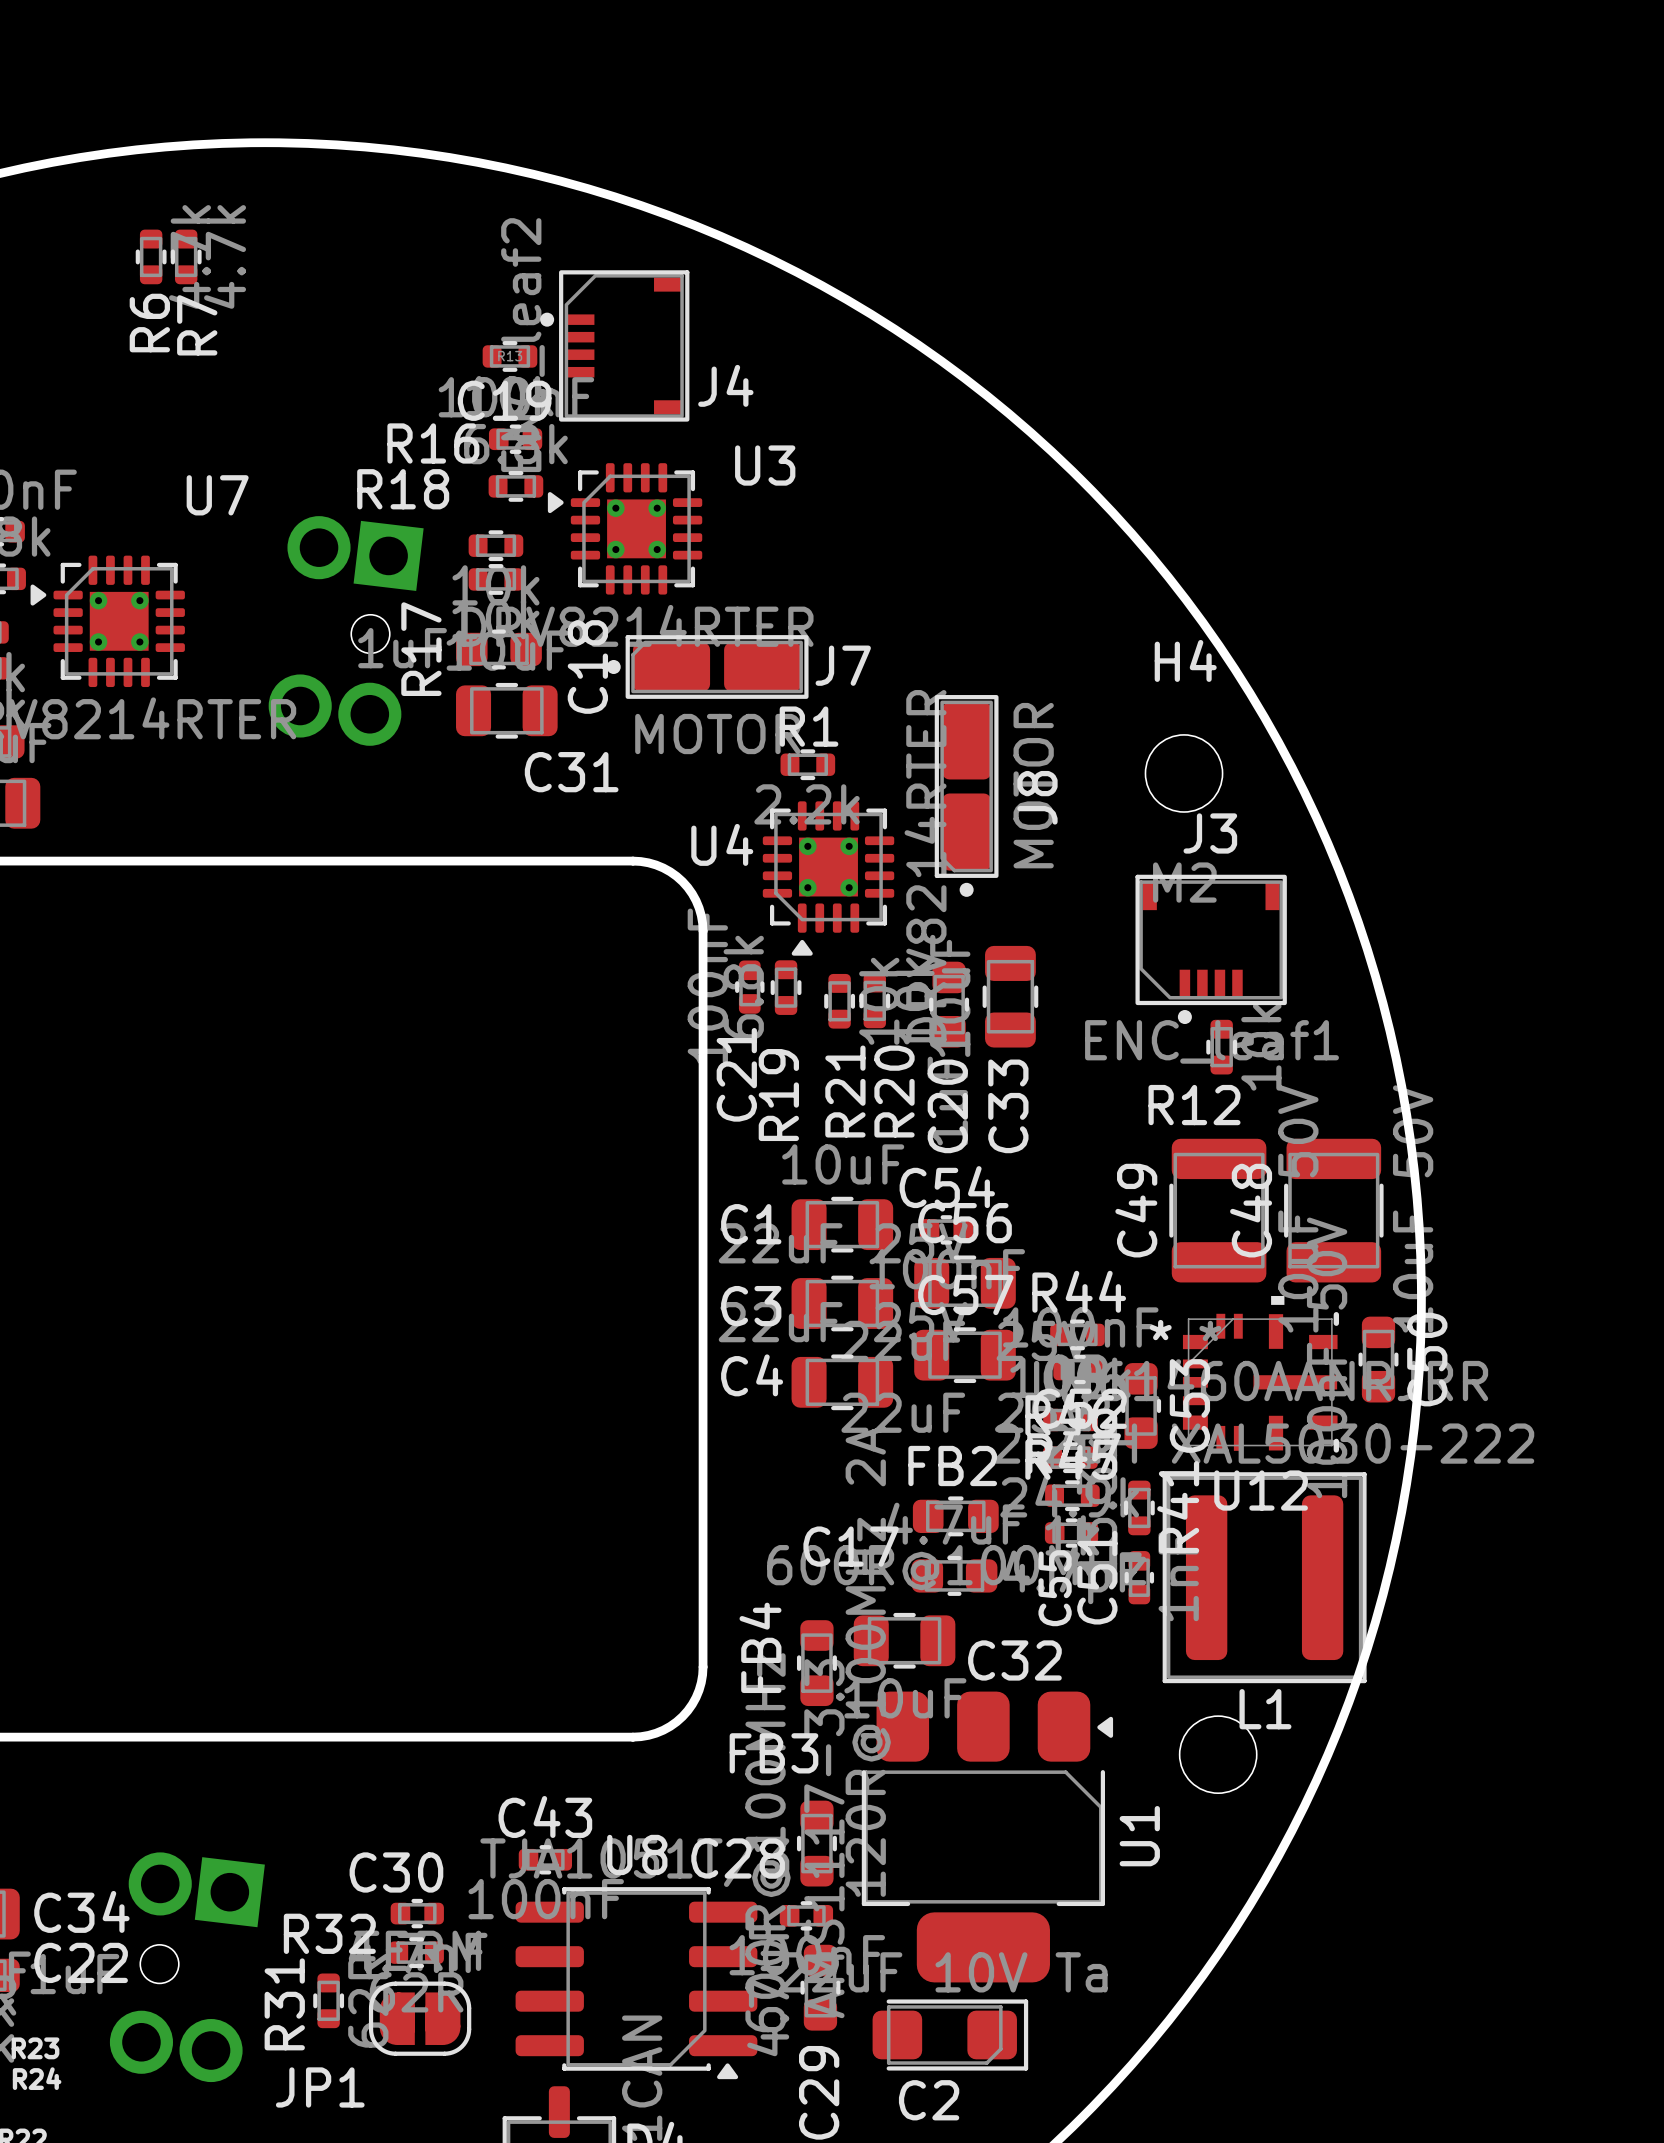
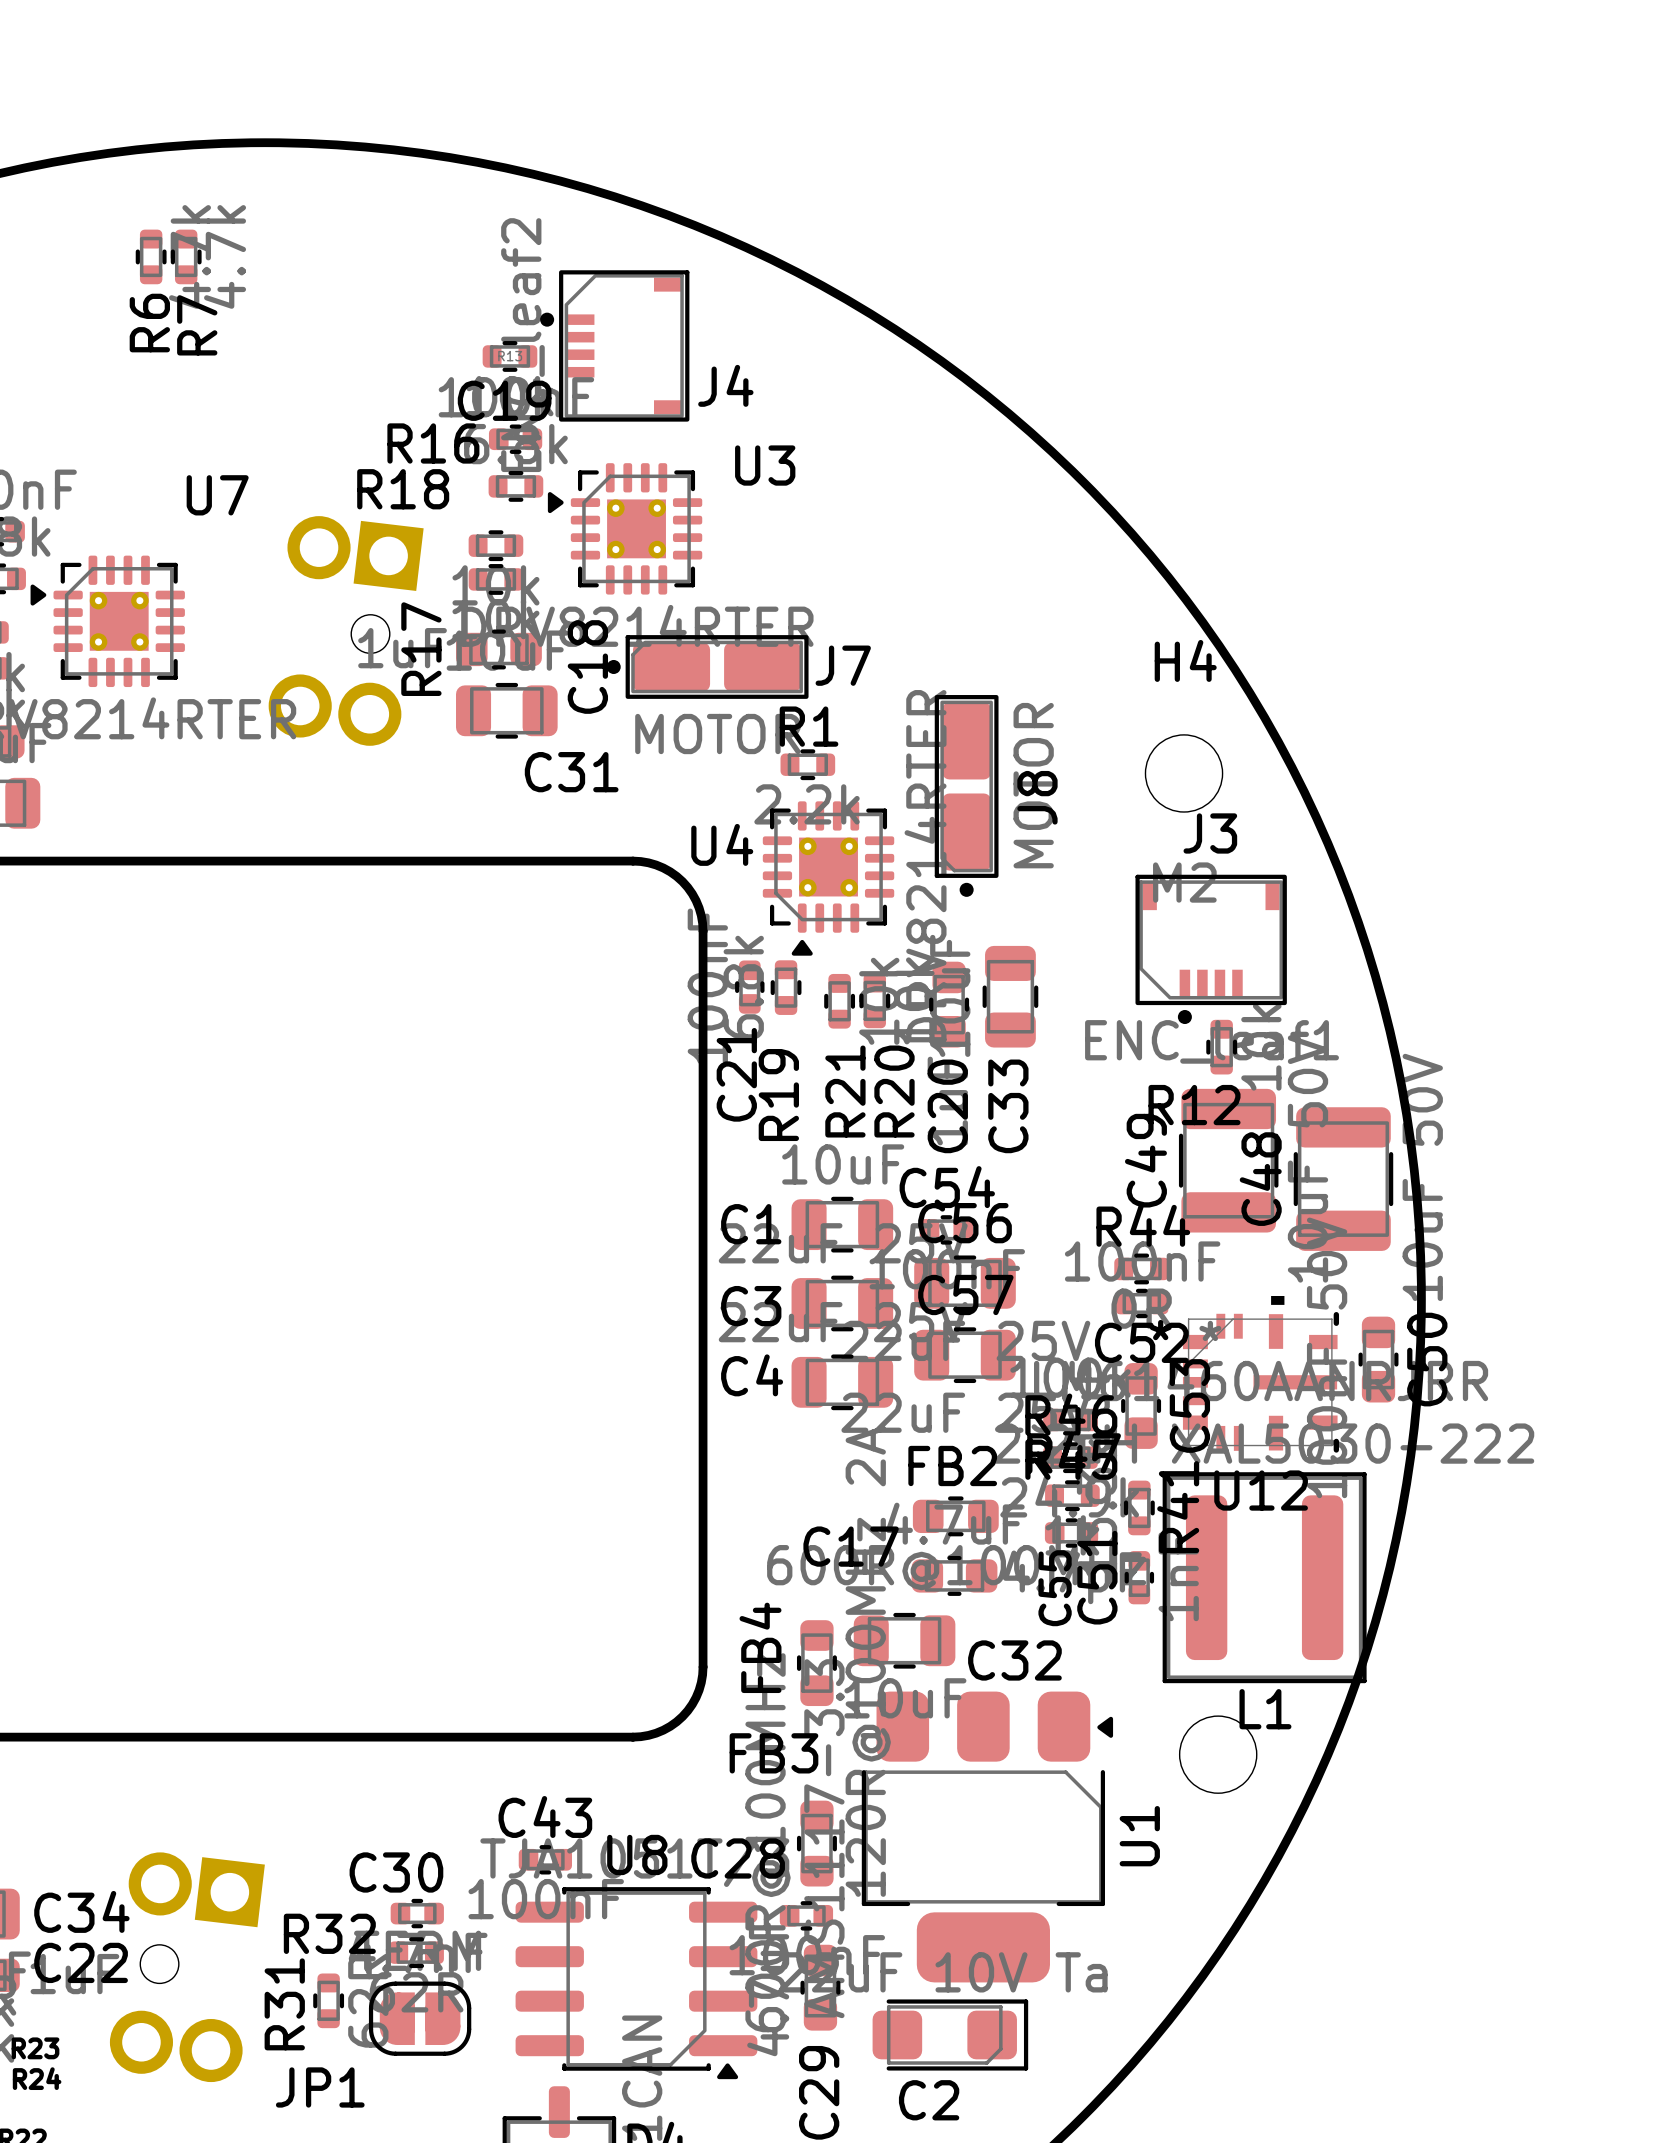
C49 position: (1219, 1210) -> (1228, 1160)
C48 position: (1333, 1210) -> (1343, 1179)
R44 position: (1077, 1334) -> (1141, 1268)
C52 position: (1079, 1369) -> (1141, 1303)

